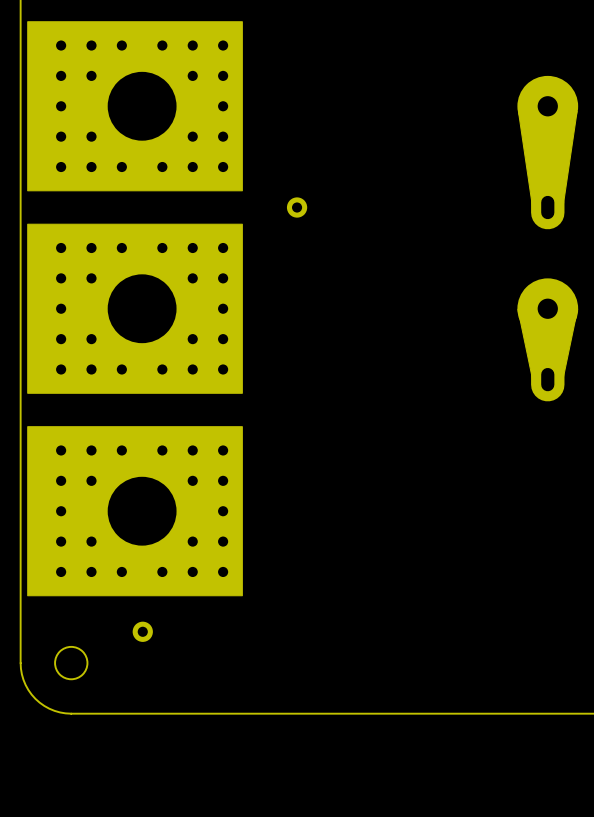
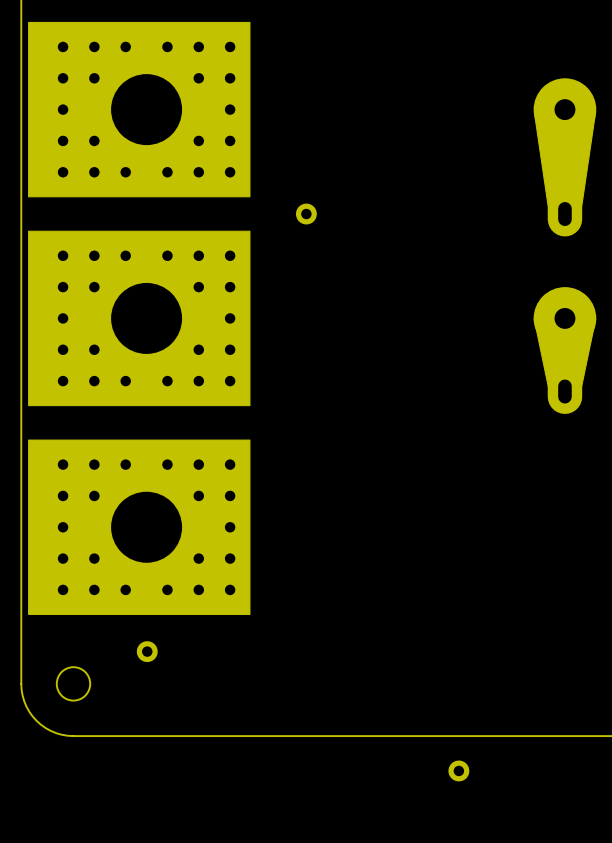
part: none -> (458, 770)

